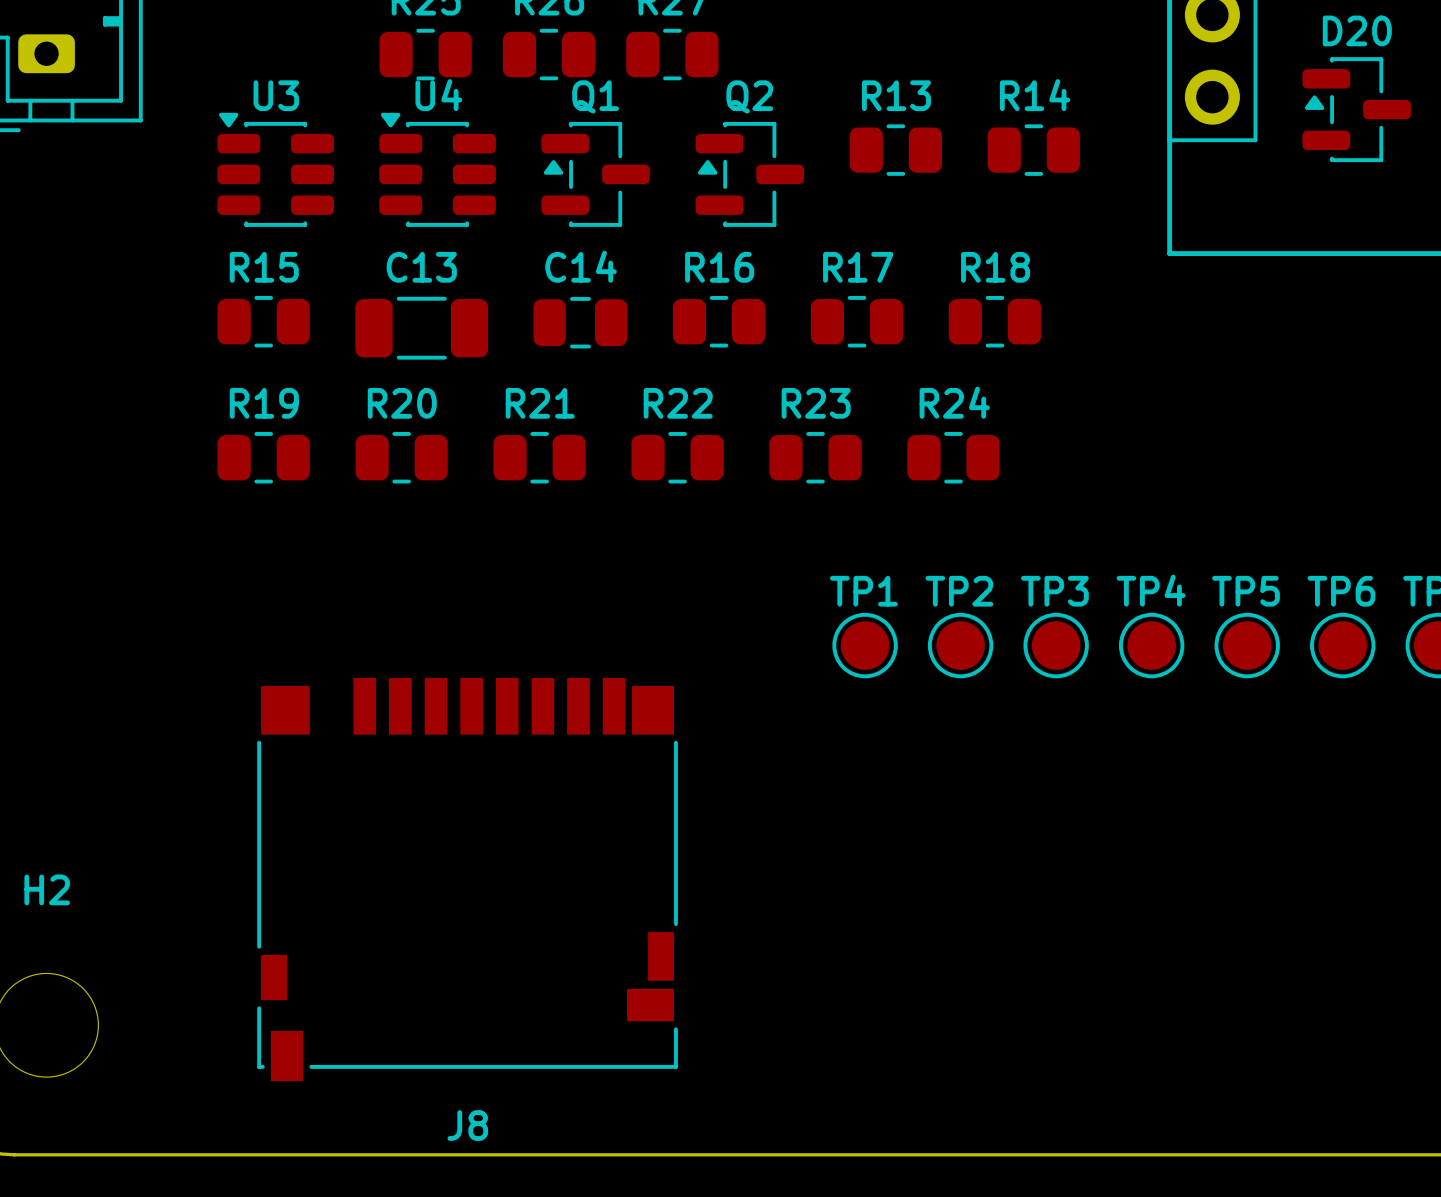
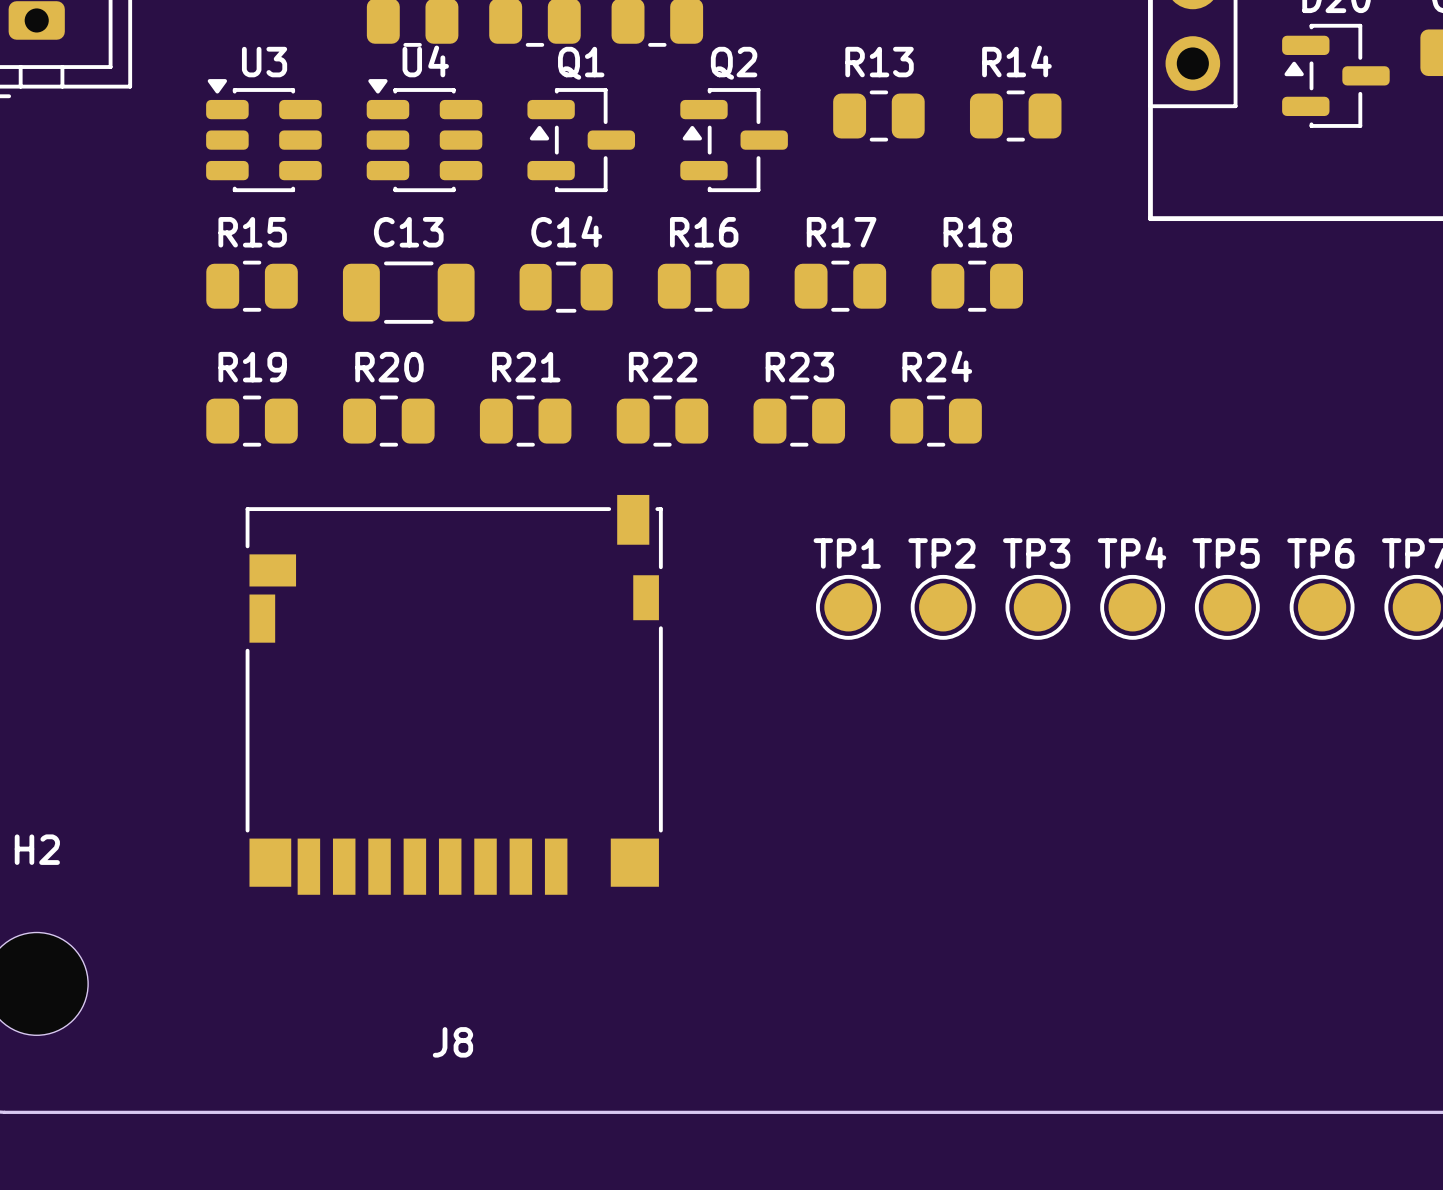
J8 rotation: 0° (467, 879) -> 180° (454, 694)
J8 name position: J8 (467, 1125) -> J8 (452, 1042)

